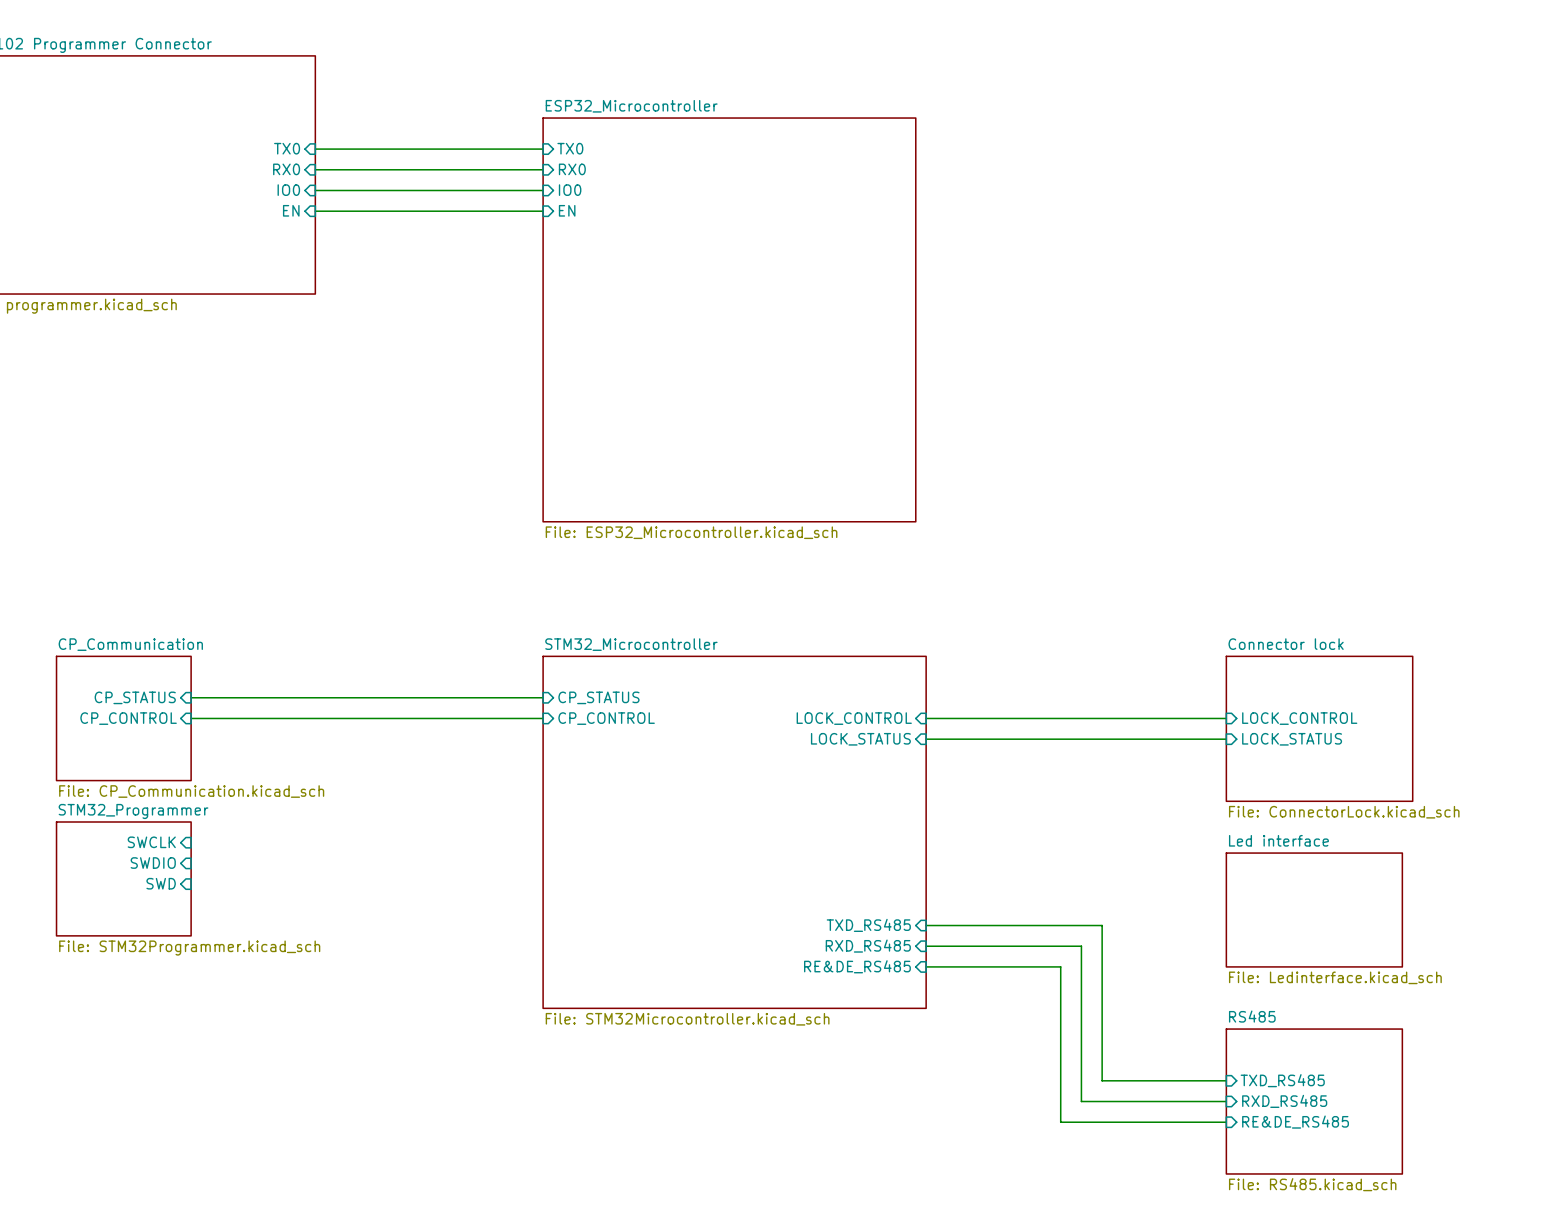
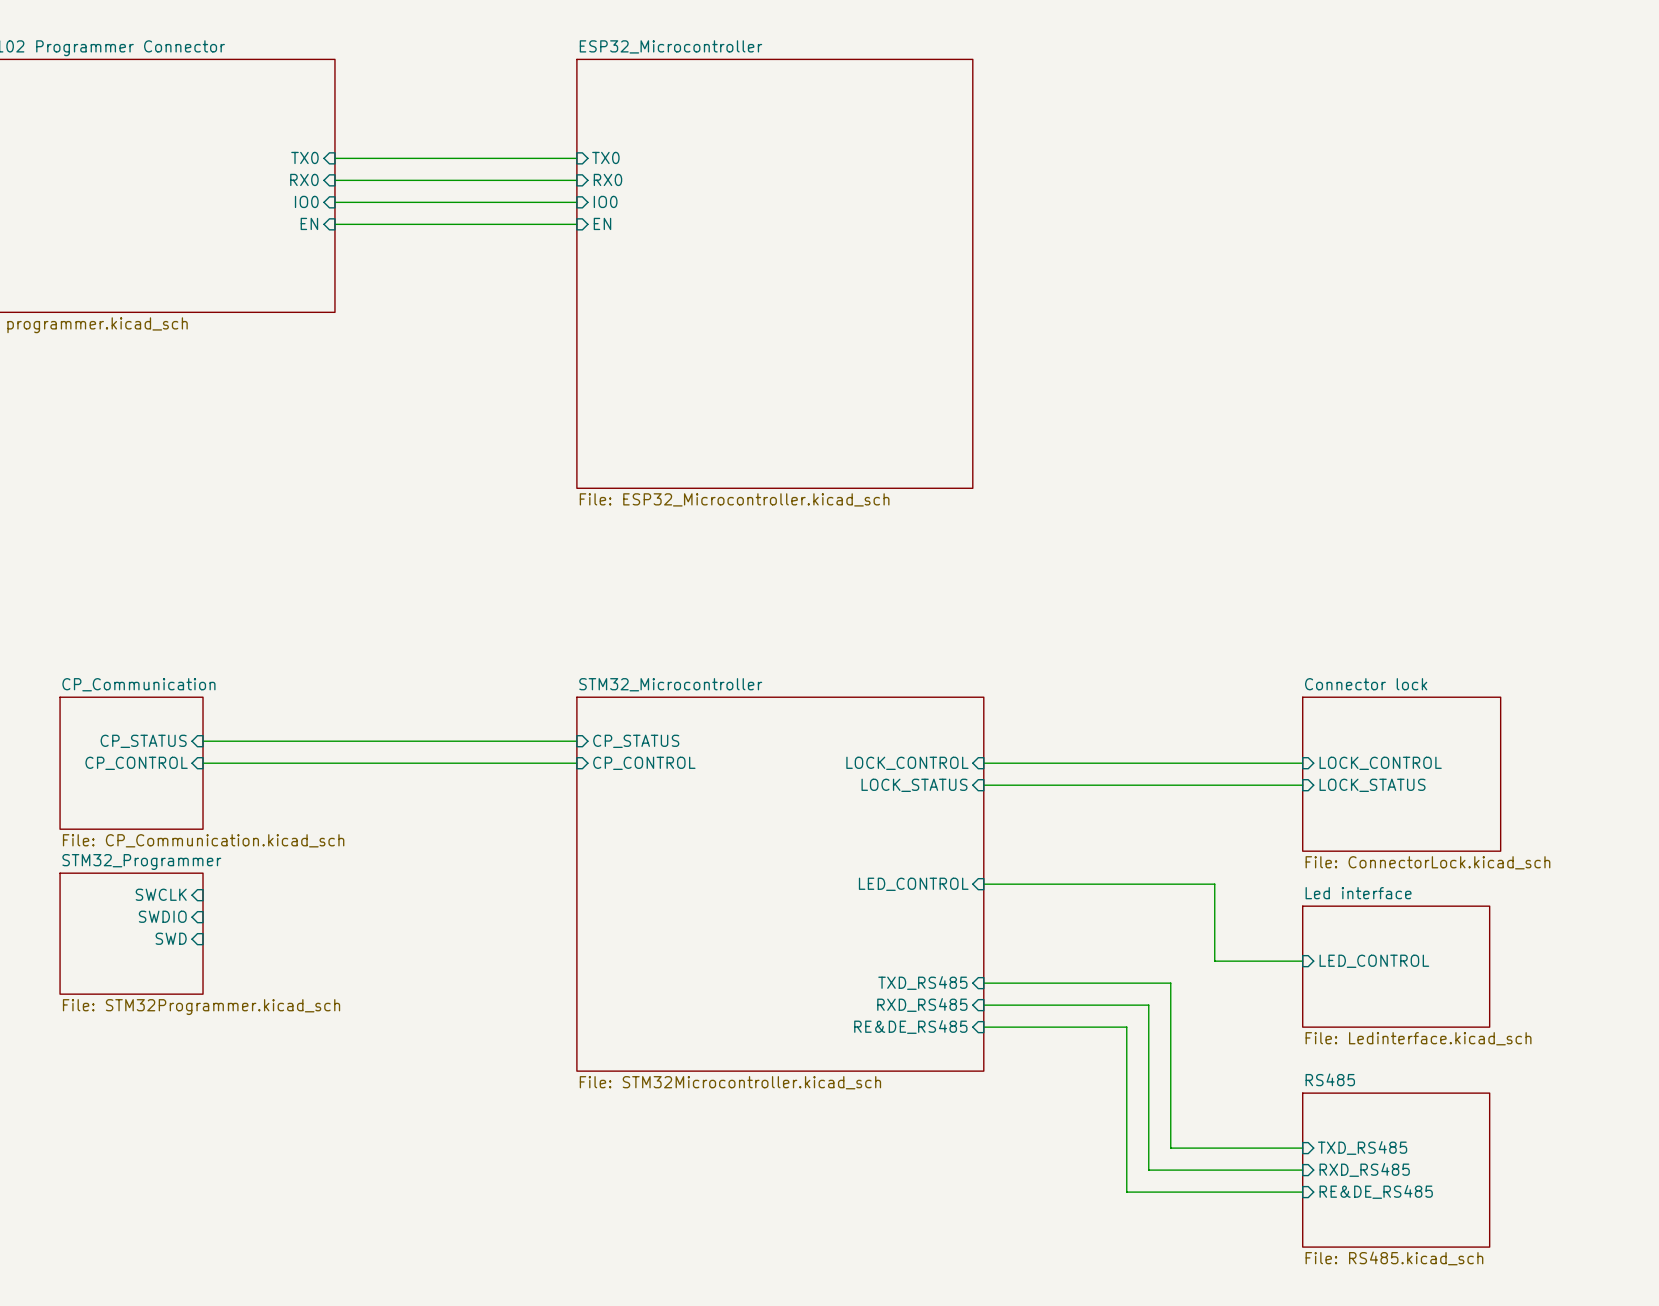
sheet ESP32_Microcontroller position: (729, 319) -> (774, 273)
sheet pin: none -> LED_CONTROL (913, 884)
wire: none -> (983, 884) (1214, 884) (1214, 961) (1302, 961)
sheet pin: none -> LED_CONTROL (1374, 961)

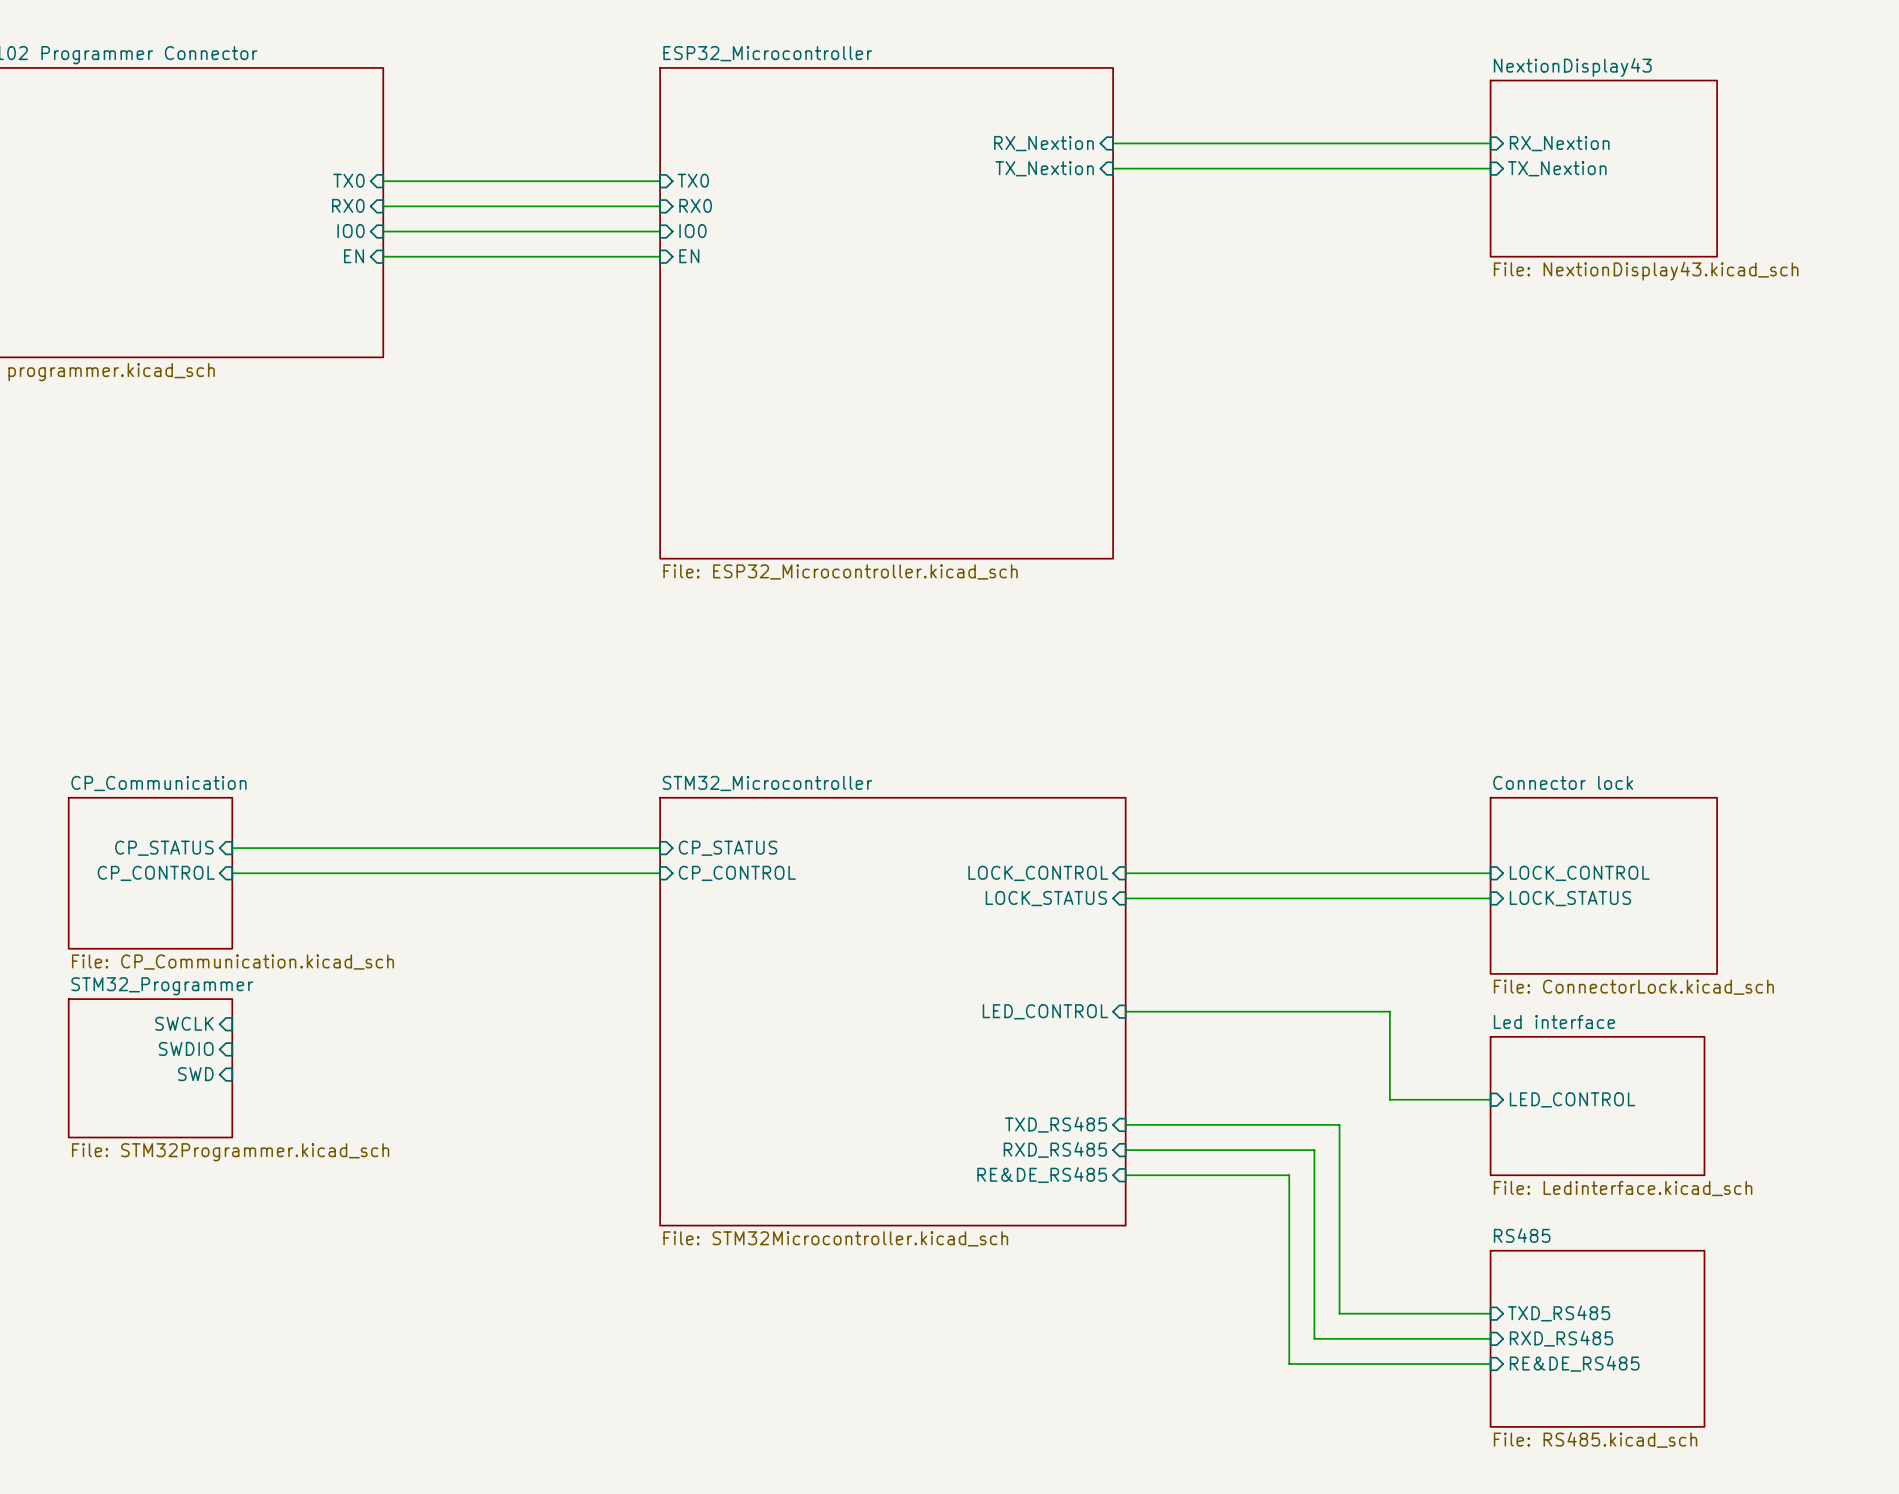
sheet pin: none -> RX_Nextion (1043, 143)
wire: none -> (1113, 143) (1490, 143)
sheet pin: none -> RX_Nextion (1559, 143)
sheet pin: none -> TX_Nextion (1044, 168)
wire: none -> (1113, 168) (1490, 168)
sheet pin: none -> TX_Nextion (1557, 168)
sheet NextionDisplay43: none -> File: NextionDisplay43.kicad_sch (1603, 168)

